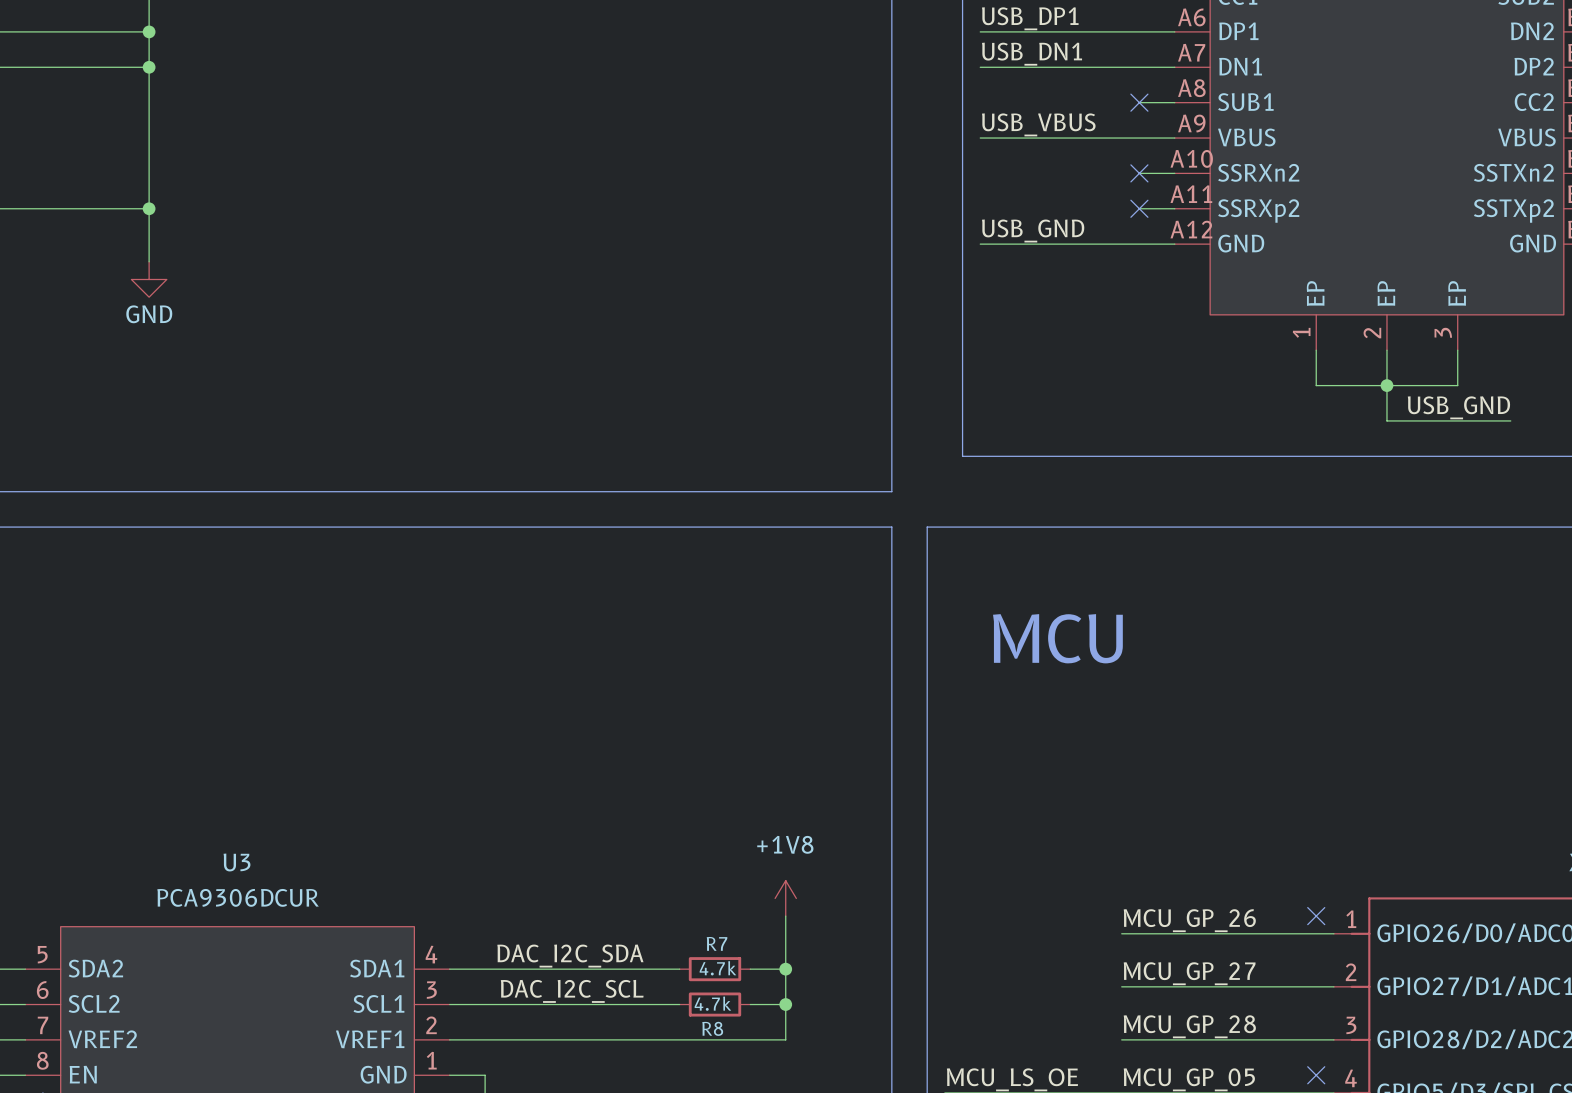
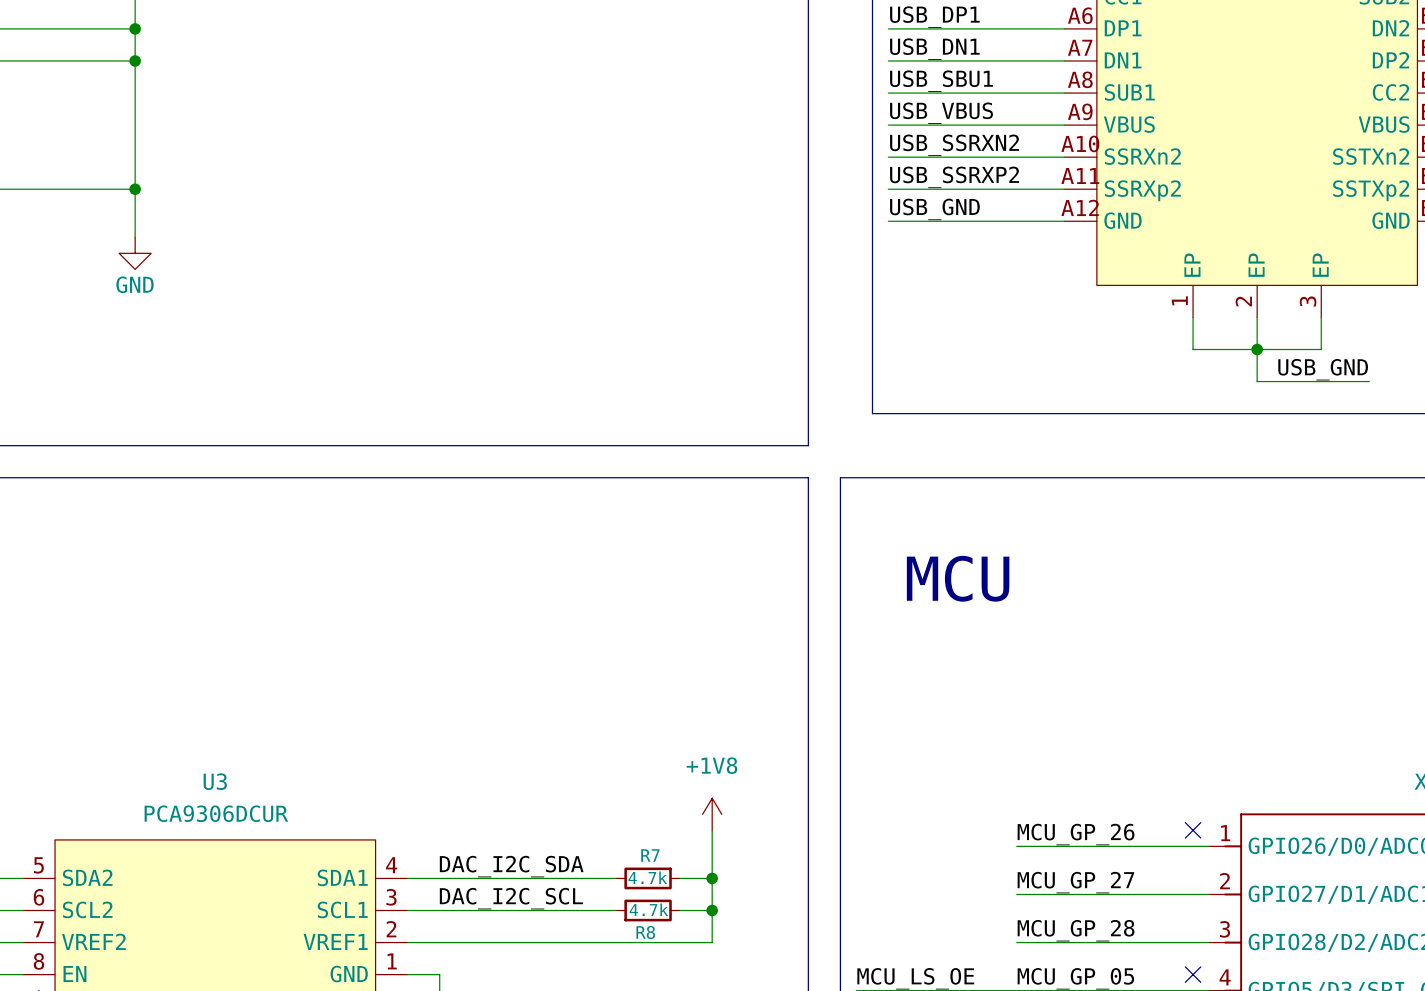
label: none -> USB_SBU1 (941, 81)
wire: none -> (888, 93) (1032, 93)
no-connect mark: (1139, 102) -> none
label: none -> USB_SSRXN2 (954, 145)
wire: none -> (888, 157) (1032, 157)
no-connect mark: (1139, 173) -> none
label: none -> USB_SSRXP2 (954, 177)
wire: none -> (888, 189) (1032, 189)
no-connect mark: (1139, 208) -> none

